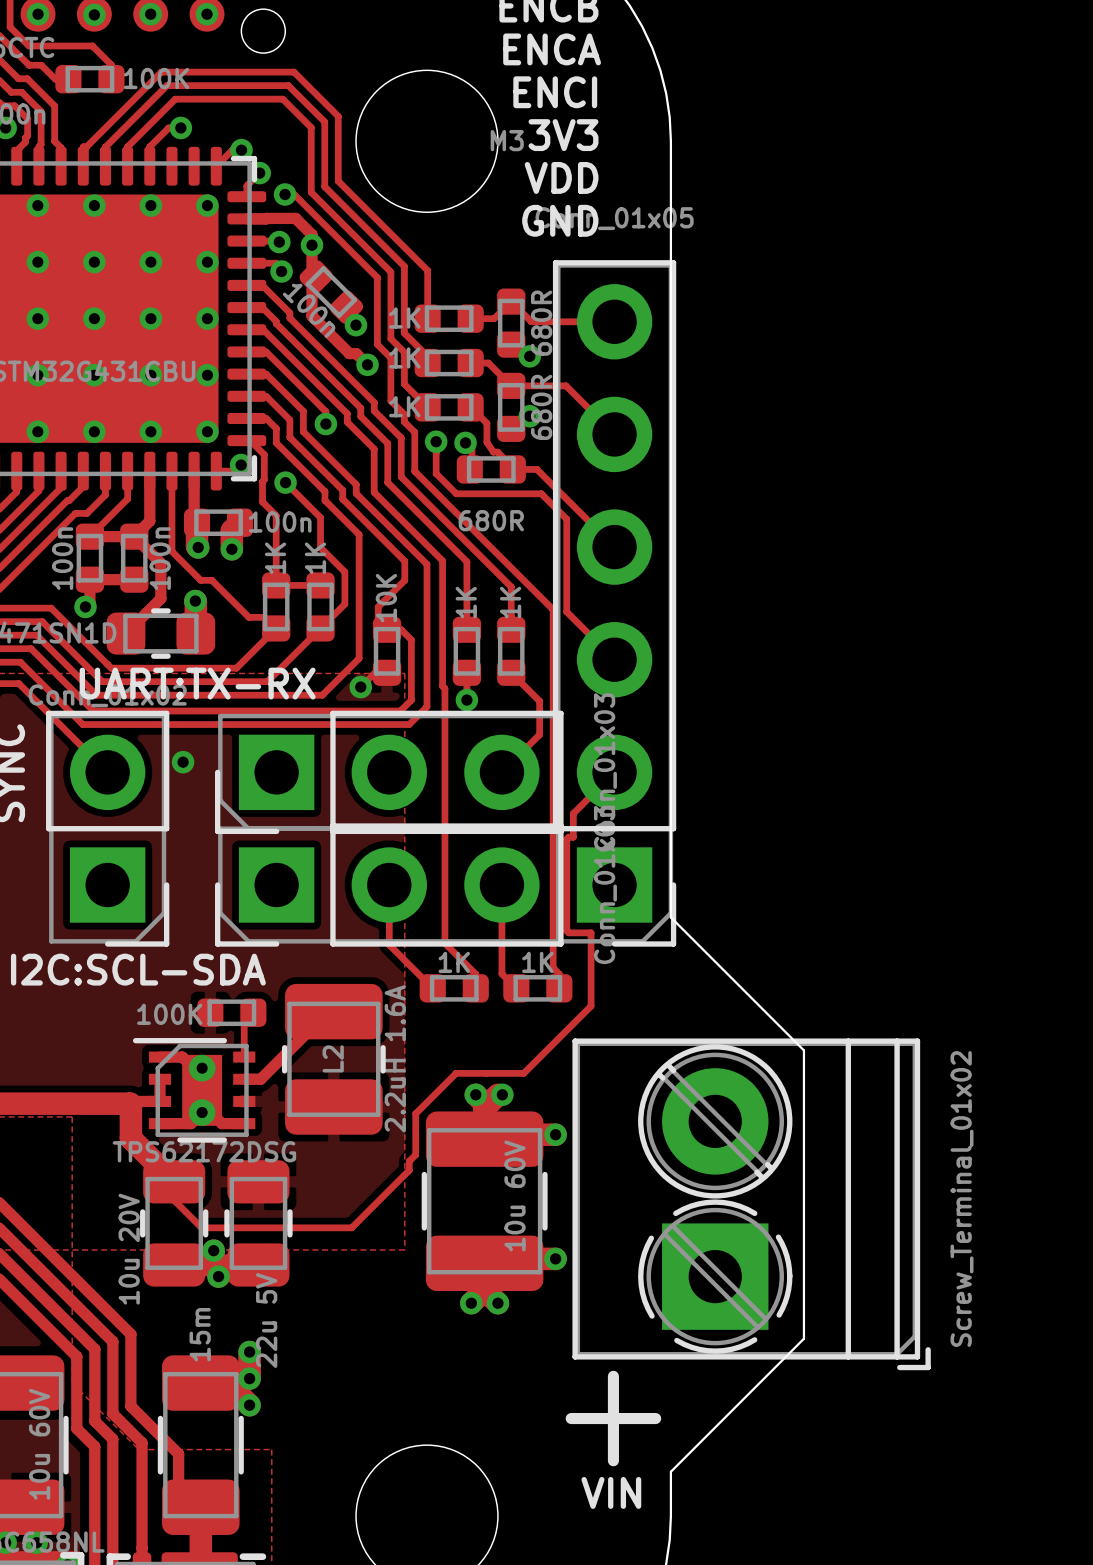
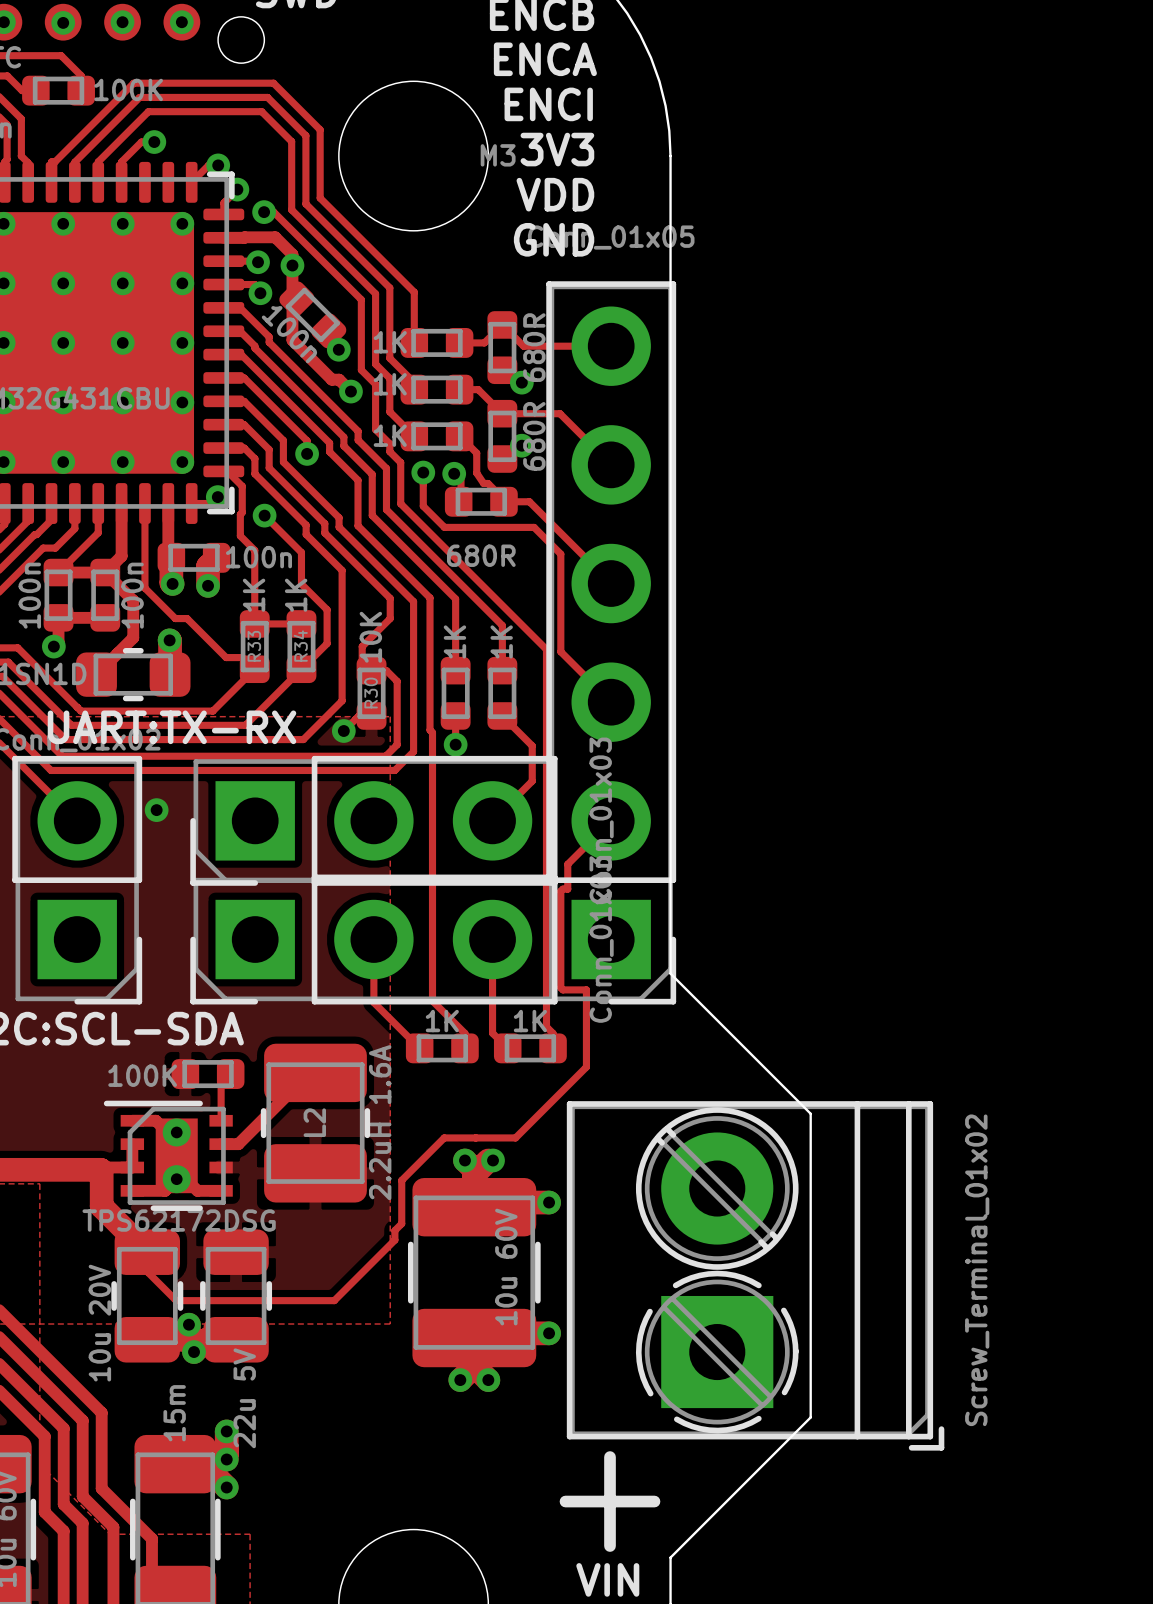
R33 name: none -> R33 (254, 646)
R34 name: none -> R34 (300, 646)
R30 name: none -> R30 (371, 693)

